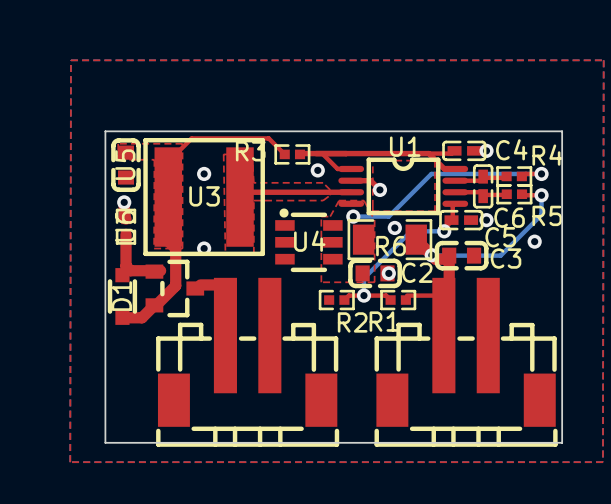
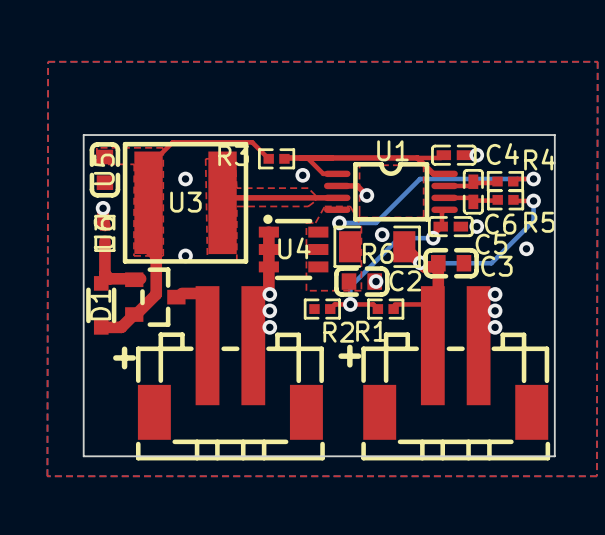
top track: none -> (268, 232) (269, 294)
via: none -> (269, 294)
via: none -> (495, 294)
via: none -> (269, 310)
via: none -> (495, 310)
via: none -> (269, 327)
via: none -> (495, 327)
text: none -> + (349, 356)
text: none -> + (124, 357)

